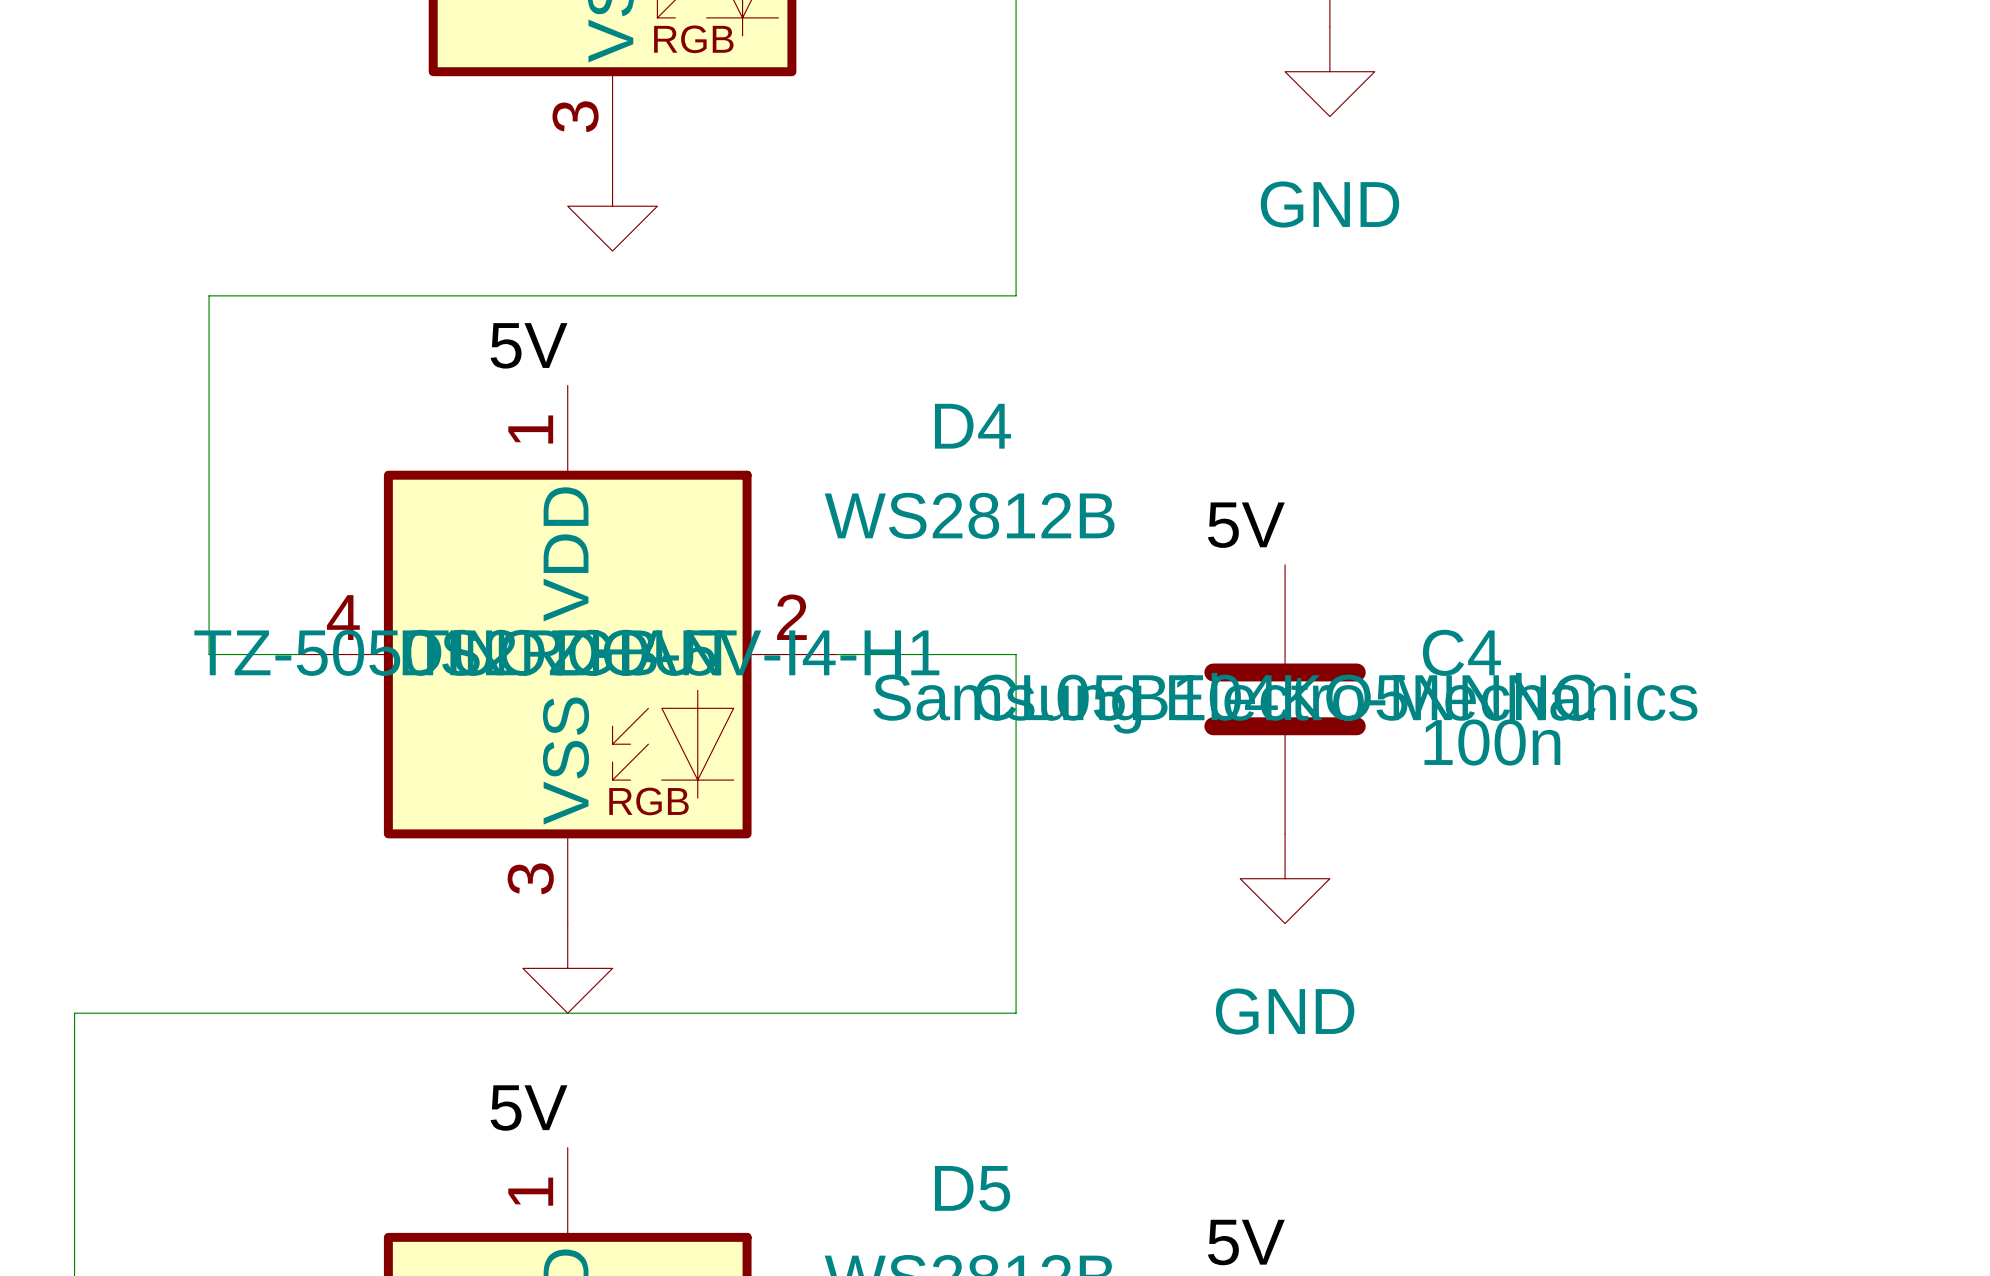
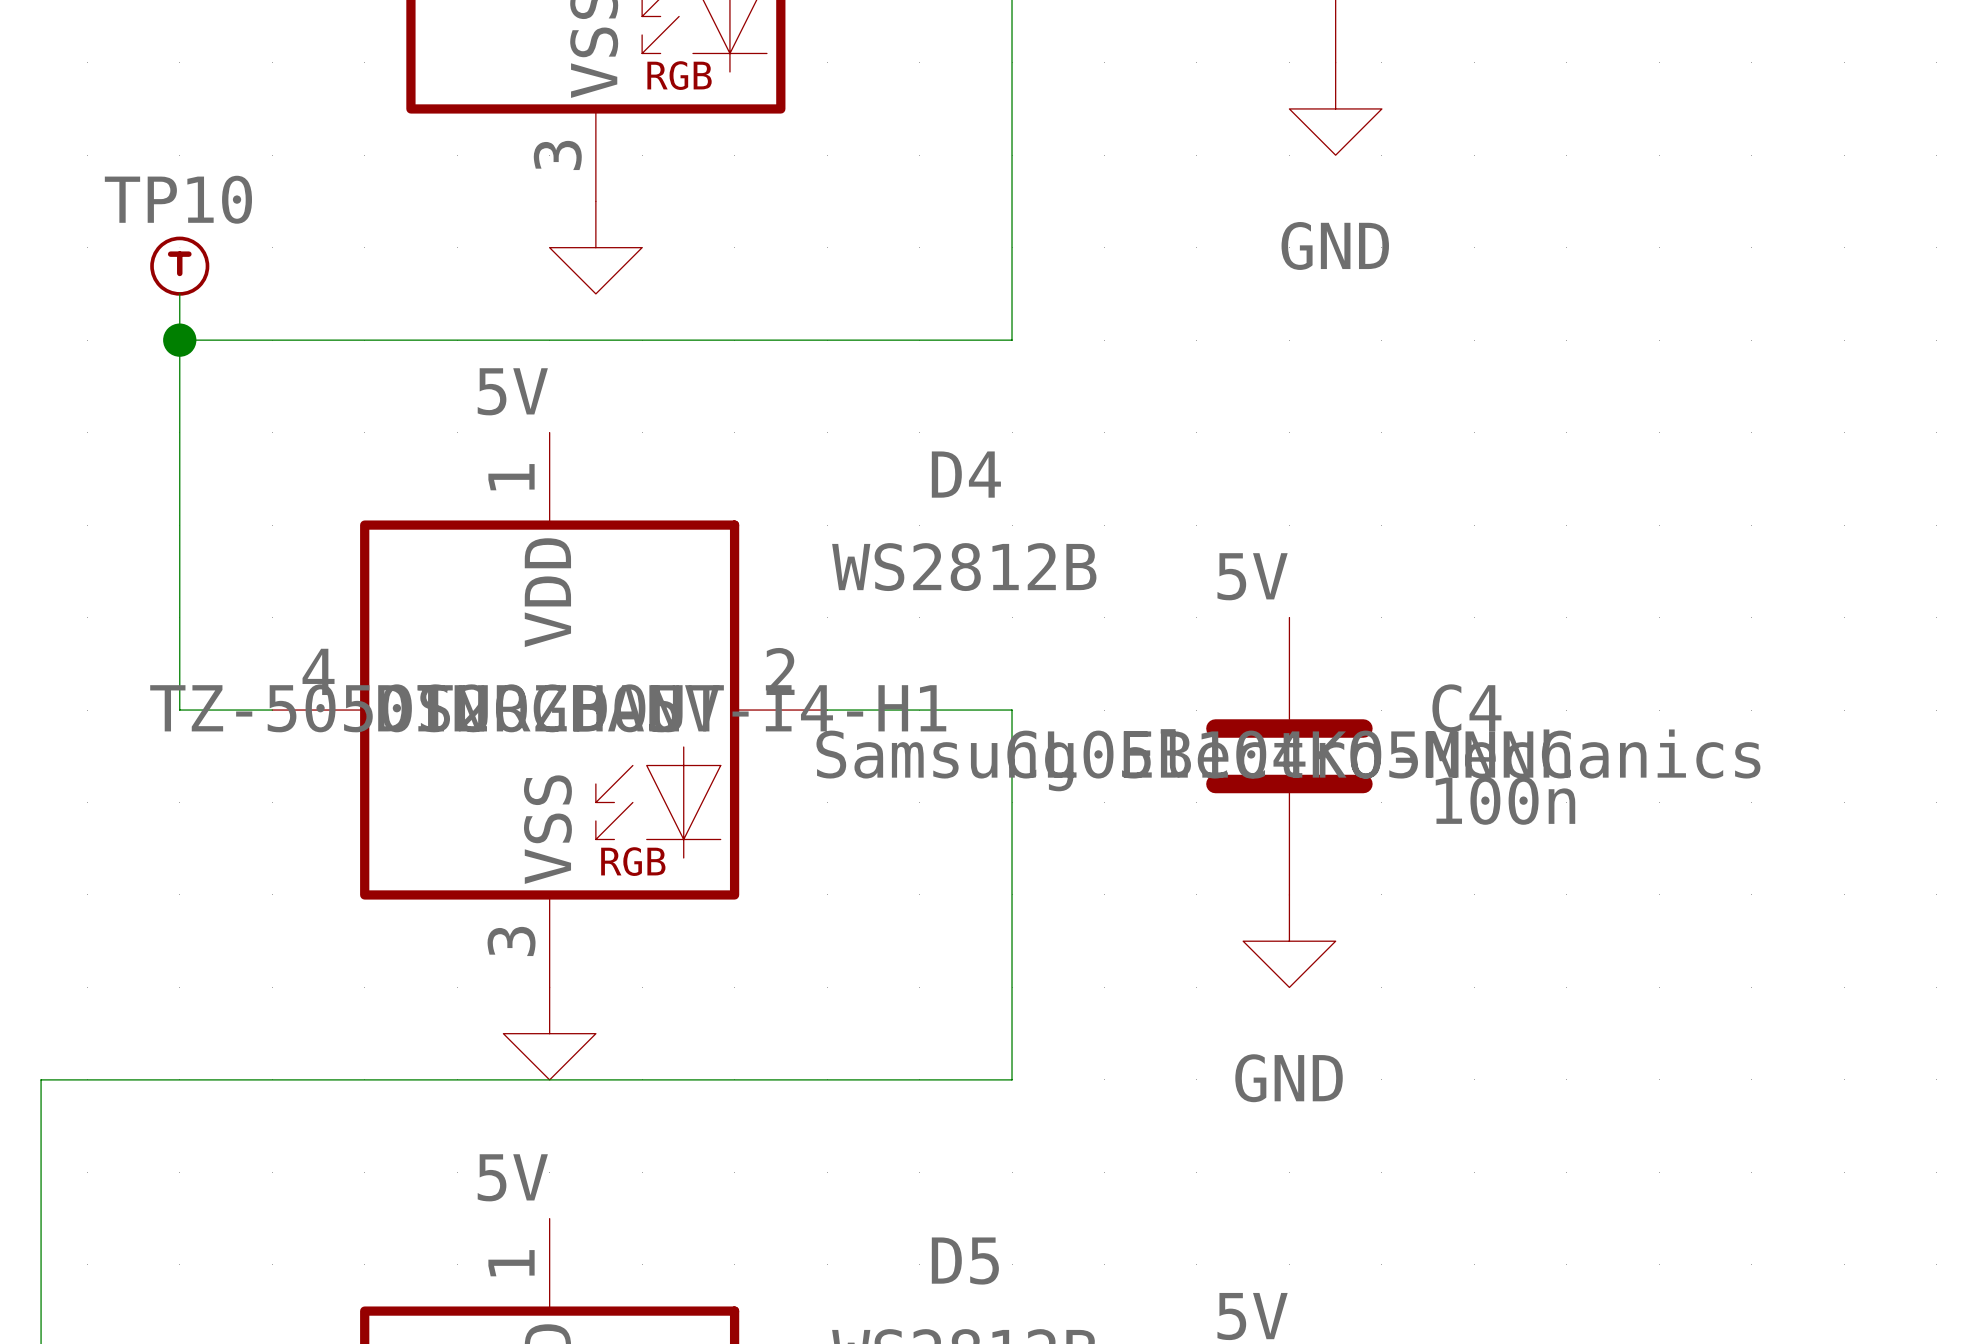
TP10: none -> (179, 266)
wire: none -> (179, 293) (179, 340)
junction: none -> (179, 340)

